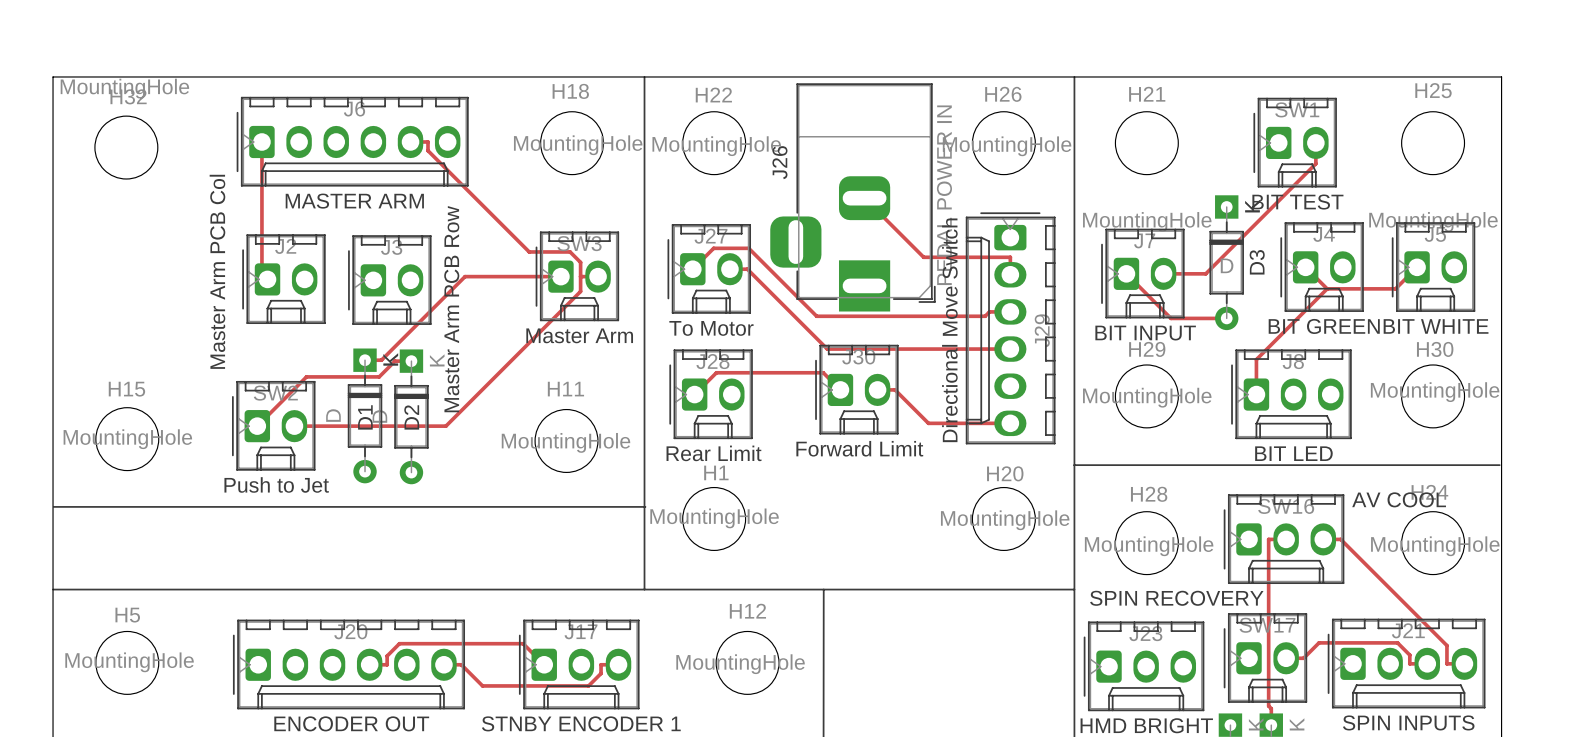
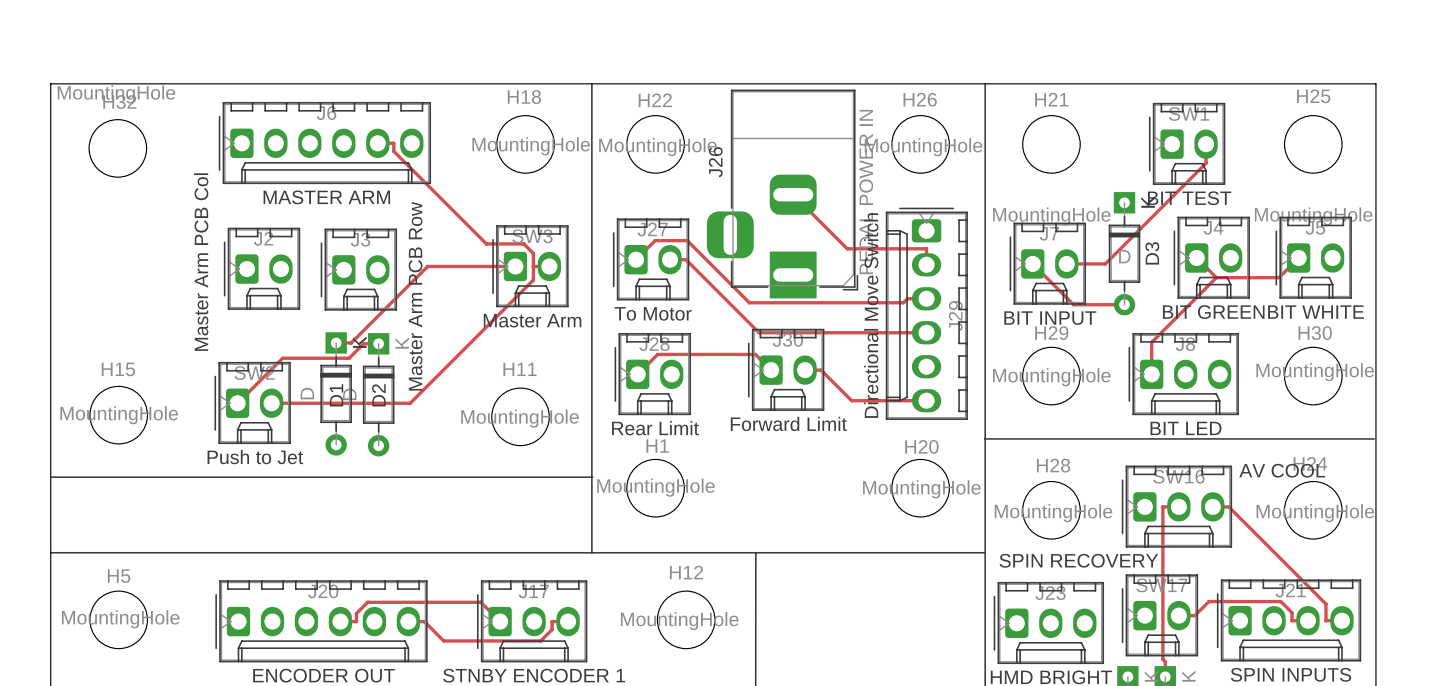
track: (261, 141) (261, 273) (267, 279) -> none

